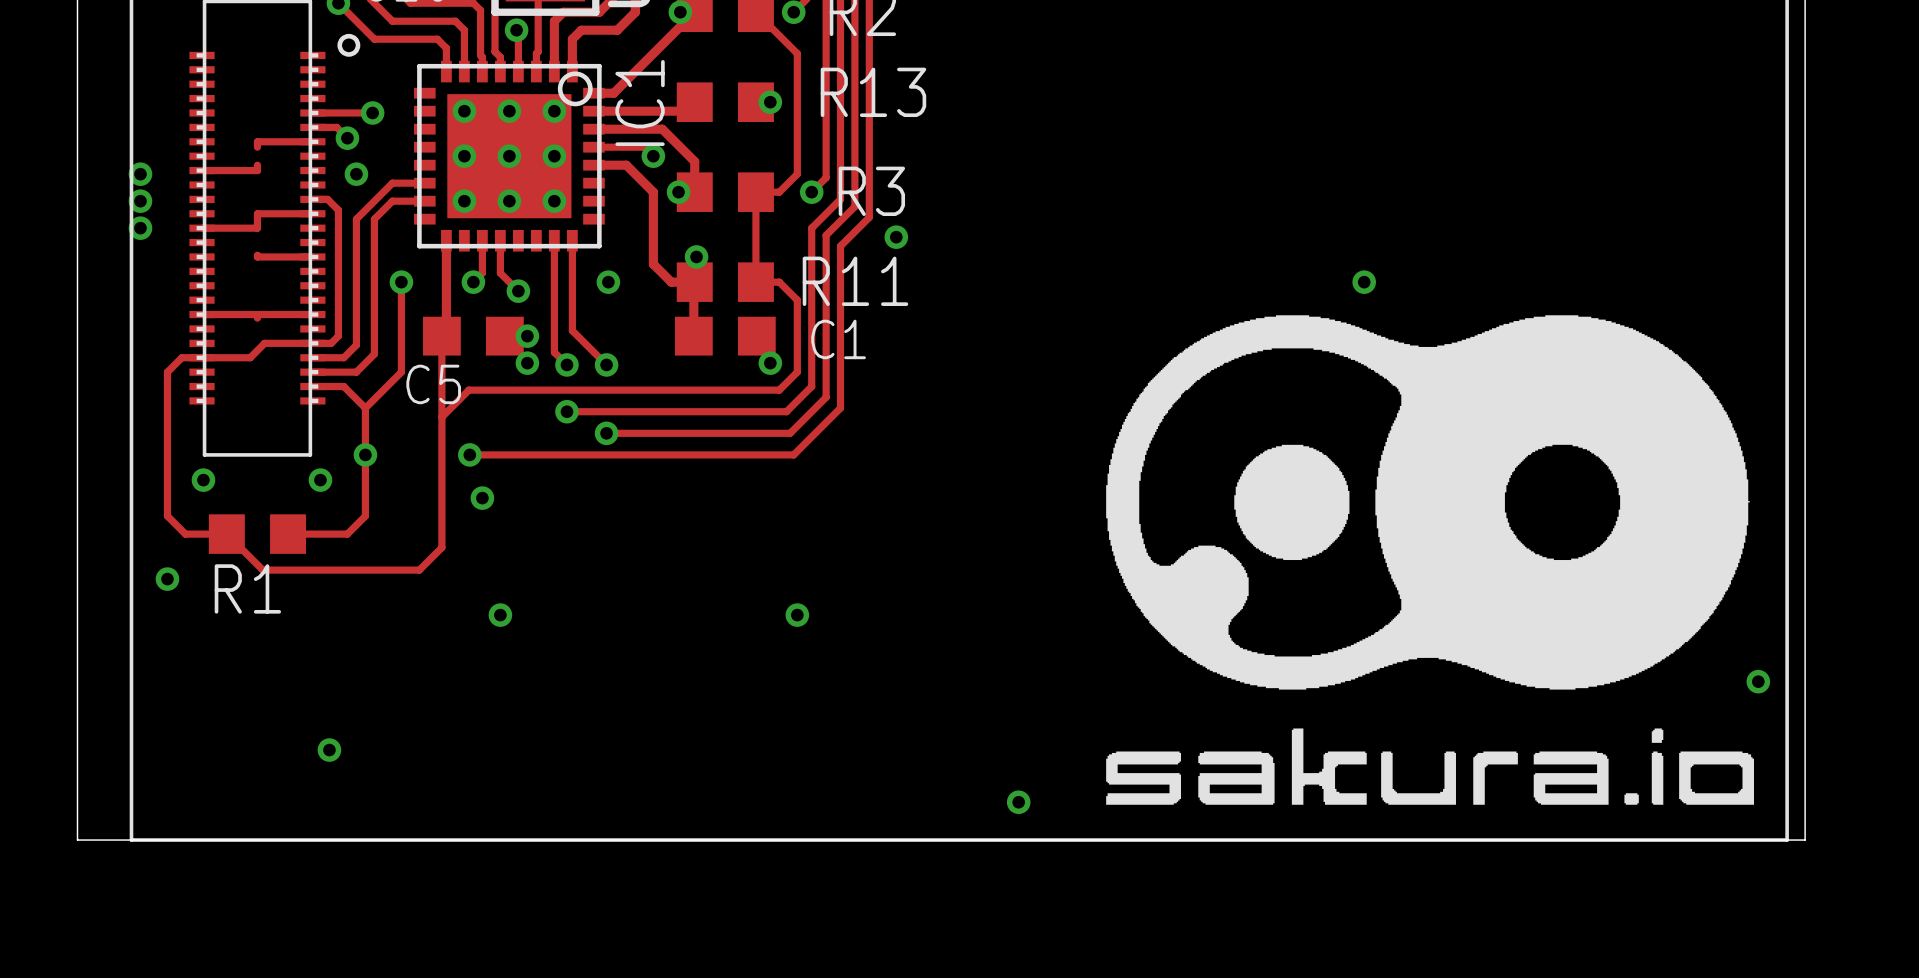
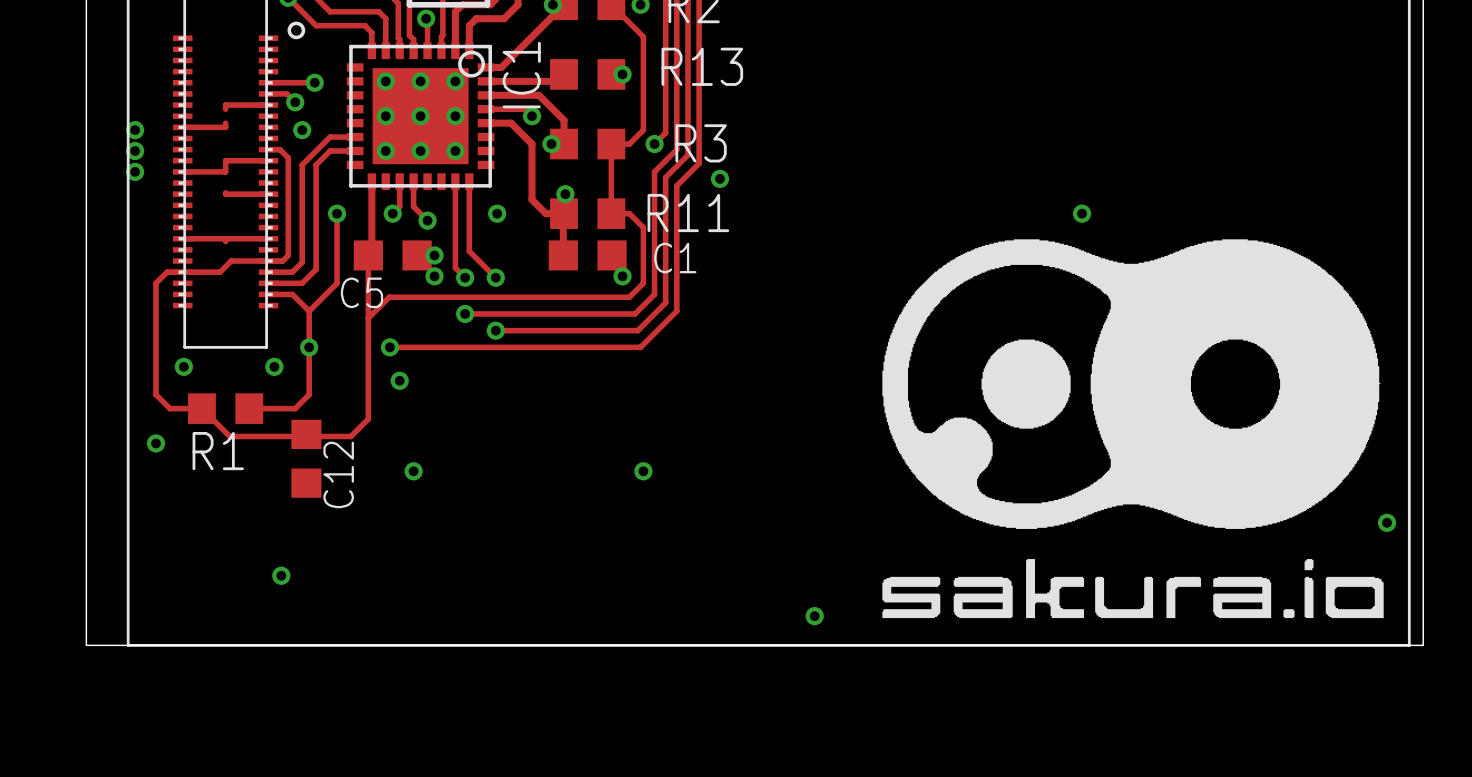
C12: none -> (306, 458)

